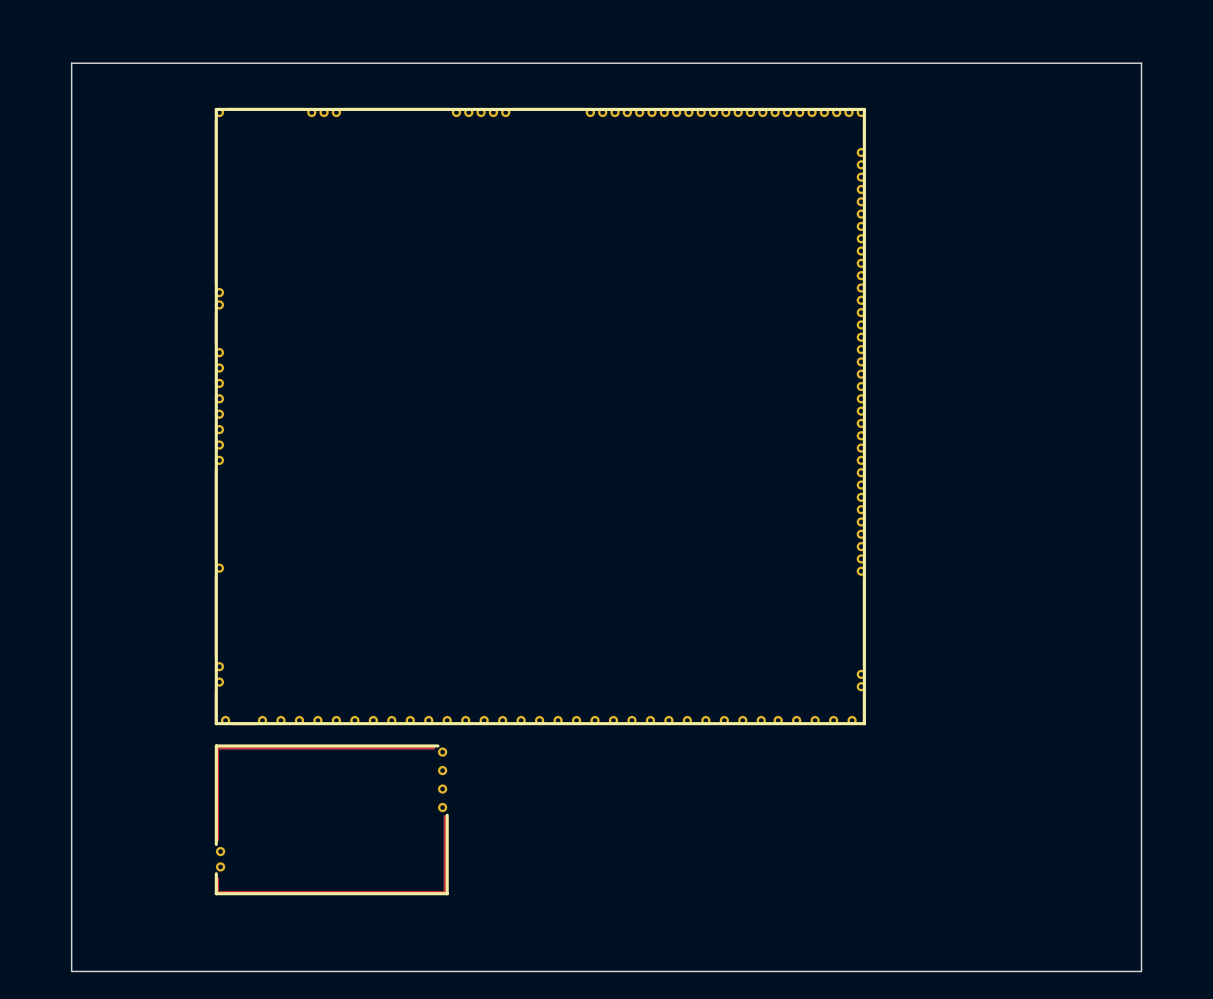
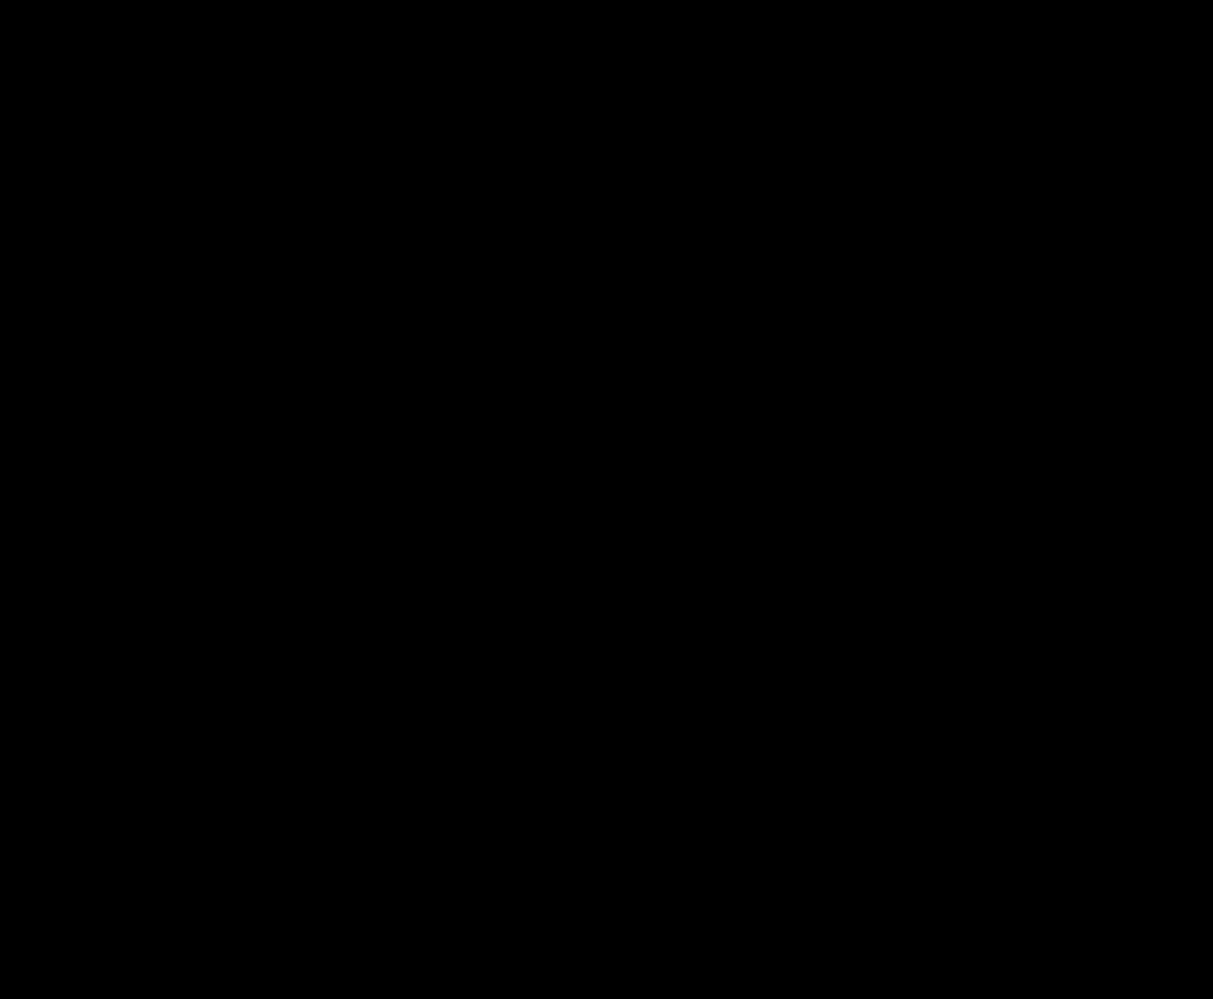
board edge: (71, 63) (1141, 63) (1141, 971) (71, 971) (71, 63) -> none
part: (540, 416) -> none
part: (331, 819) -> none

